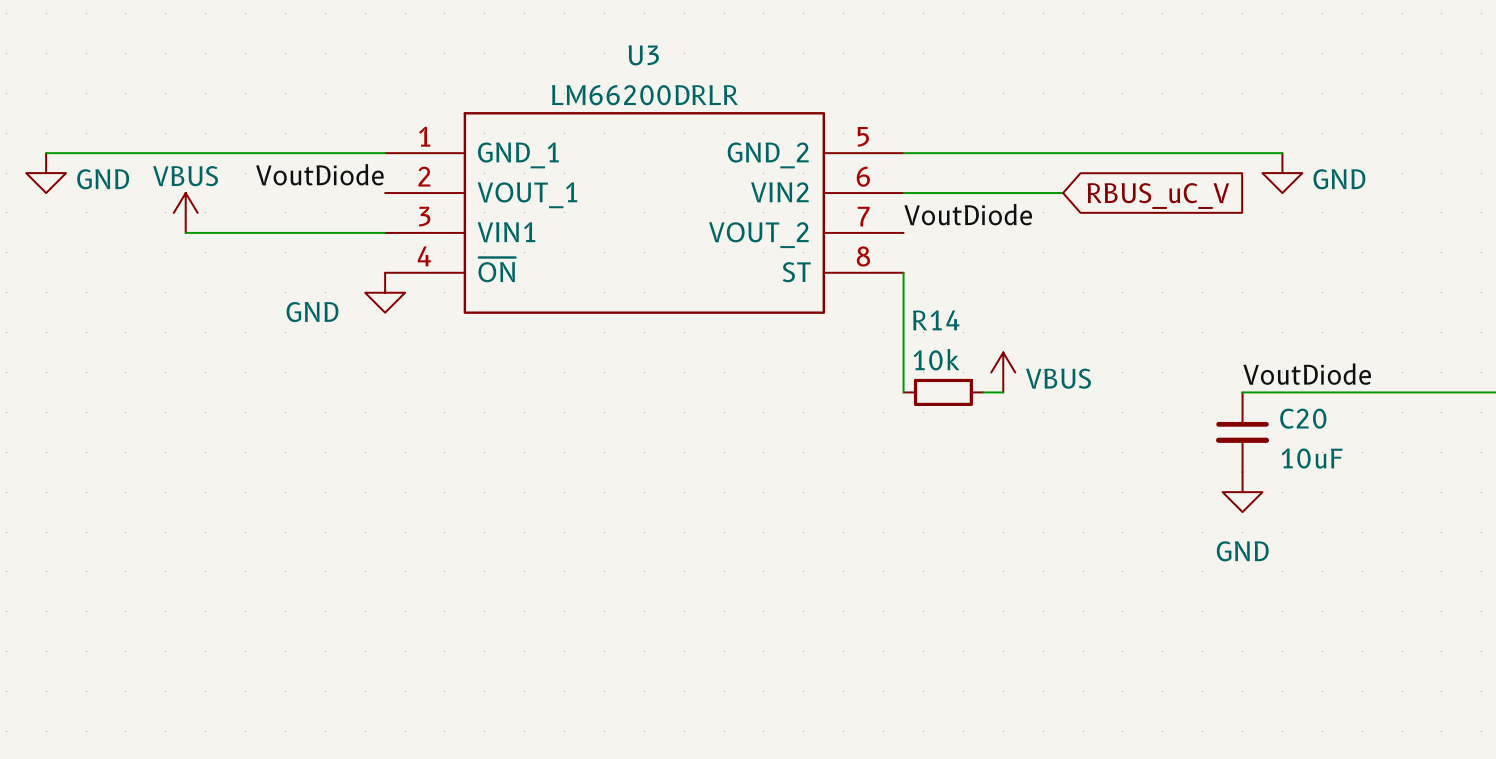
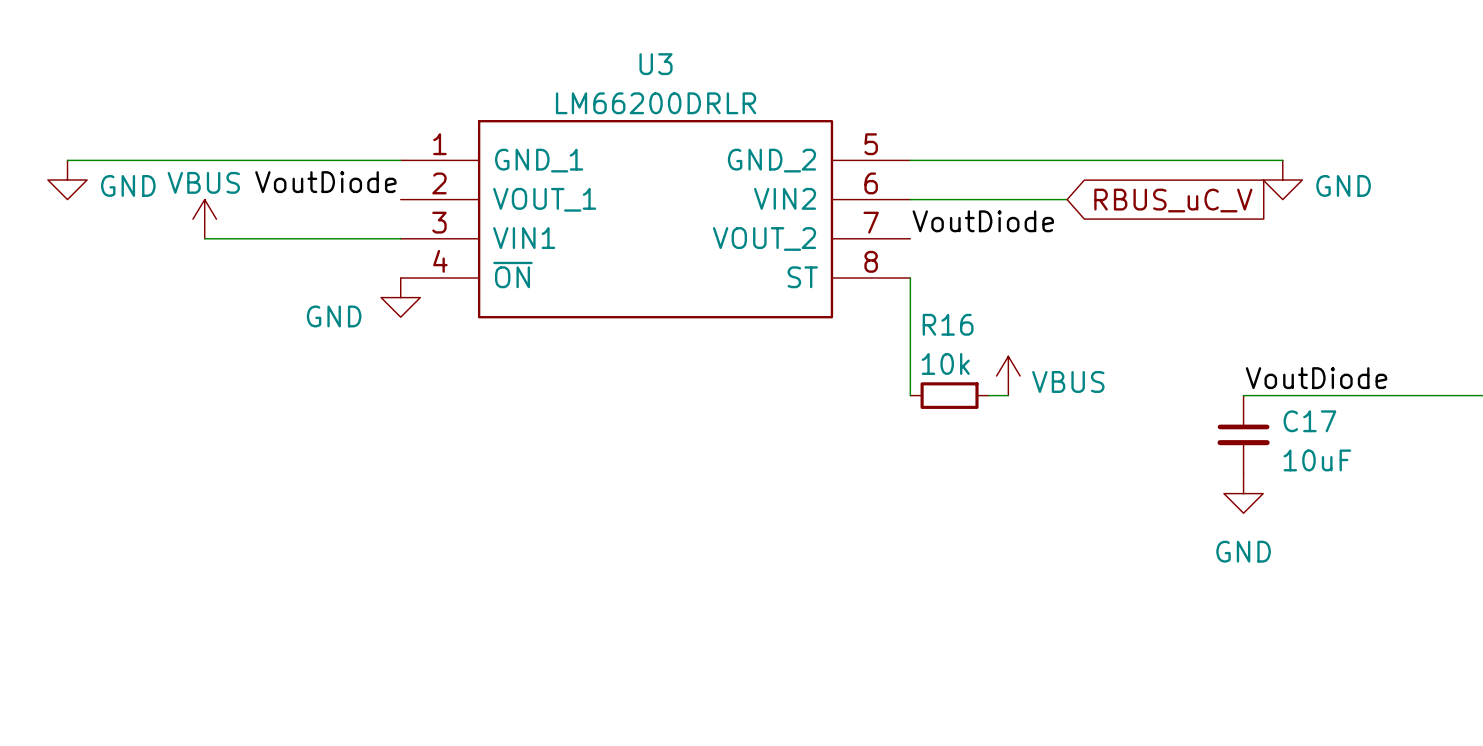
R14 name: R14 (936, 320) -> R16 (948, 324)
C20 name: C20 (1303, 418) -> C17 (1309, 421)

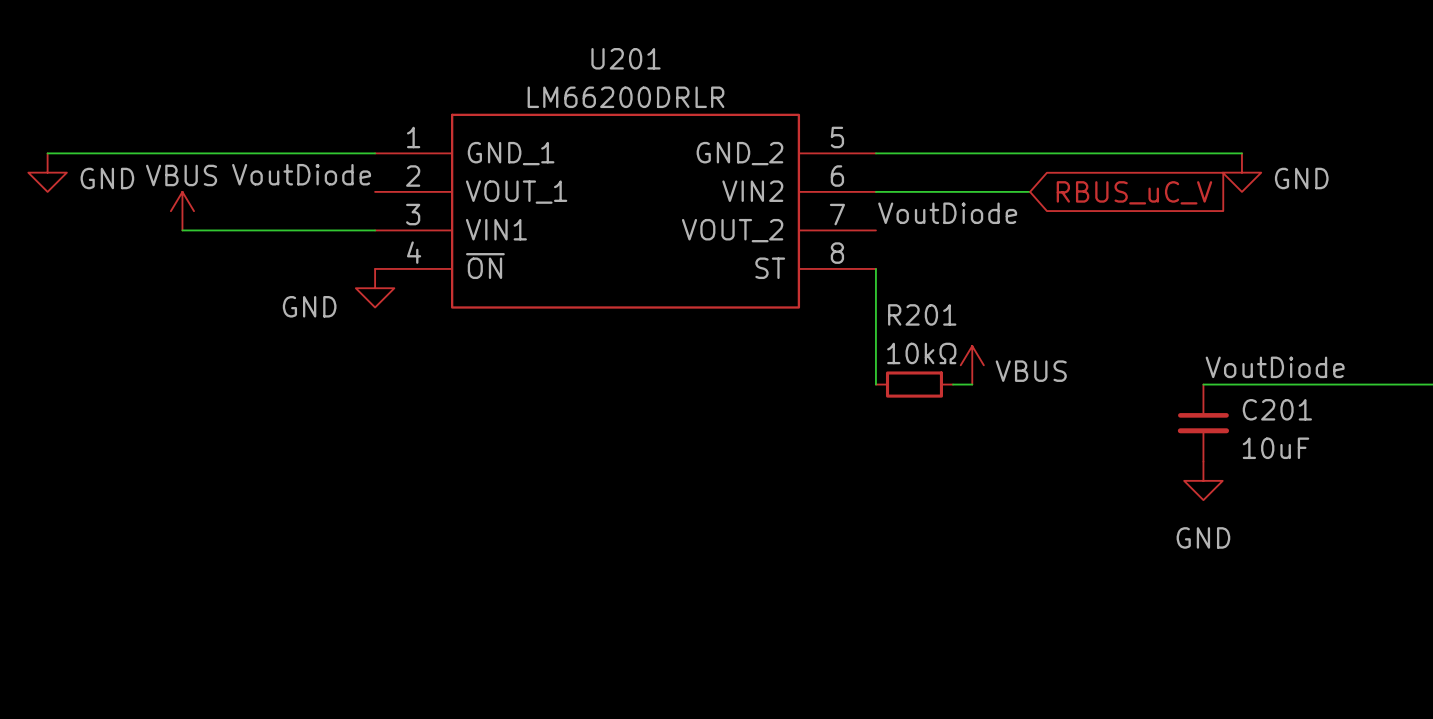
U3 name: U3 (656, 64) -> U201 (625, 58)
R16 name: R16 (948, 324) -> R201 (922, 314)
R16 value: 10k (945, 363) -> 10kΩ (921, 353)
C17 name: C17 (1309, 421) -> C201 (1277, 409)

